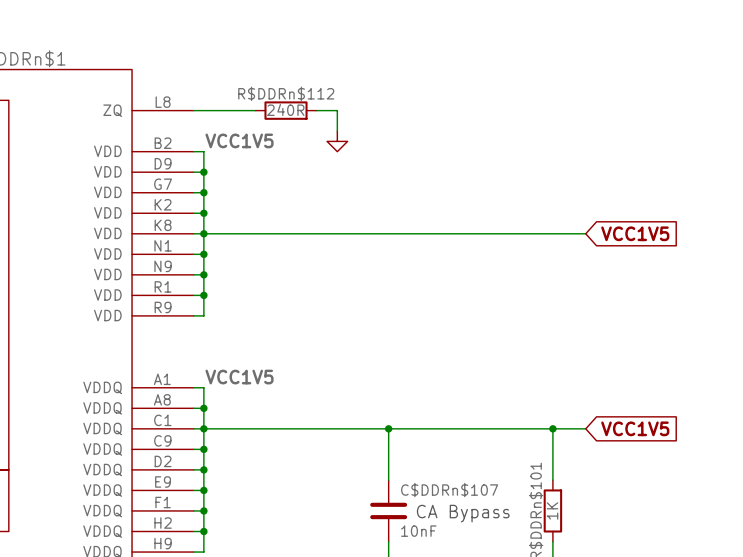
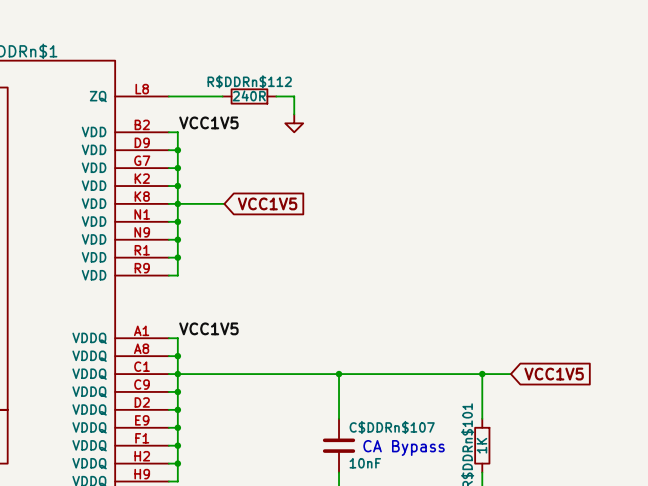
wire: (257, 233) (585, 233) -> none
global label: none -> VCC1V5 (267, 203)
global label: VCC1V5 (635, 233) -> none

